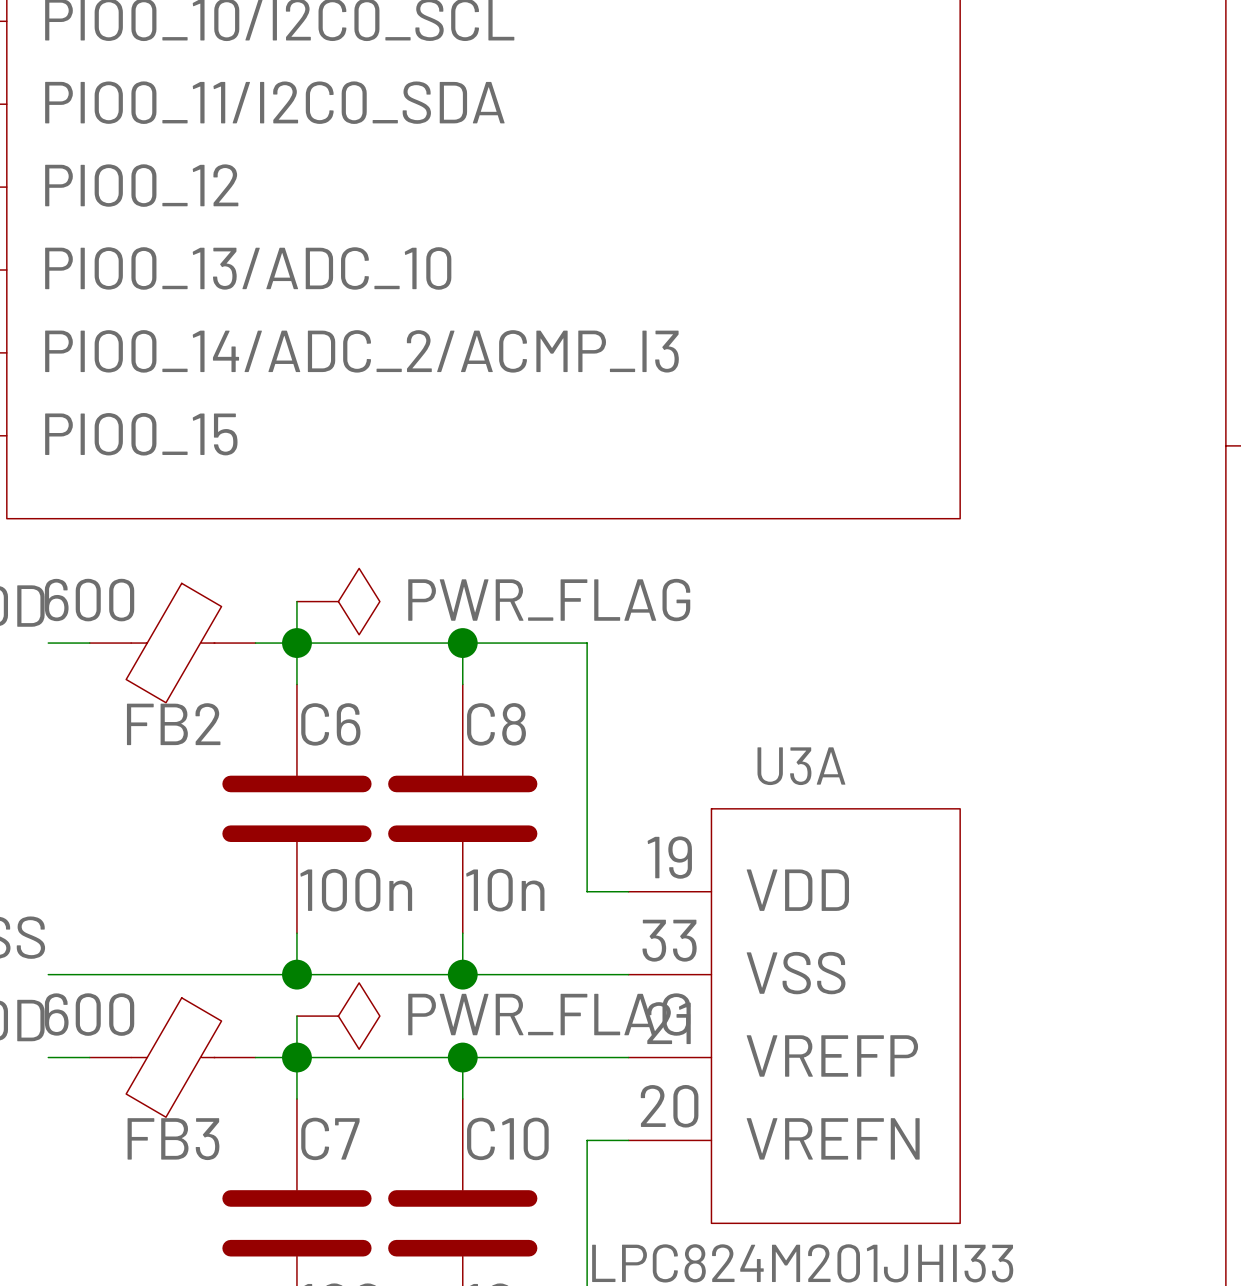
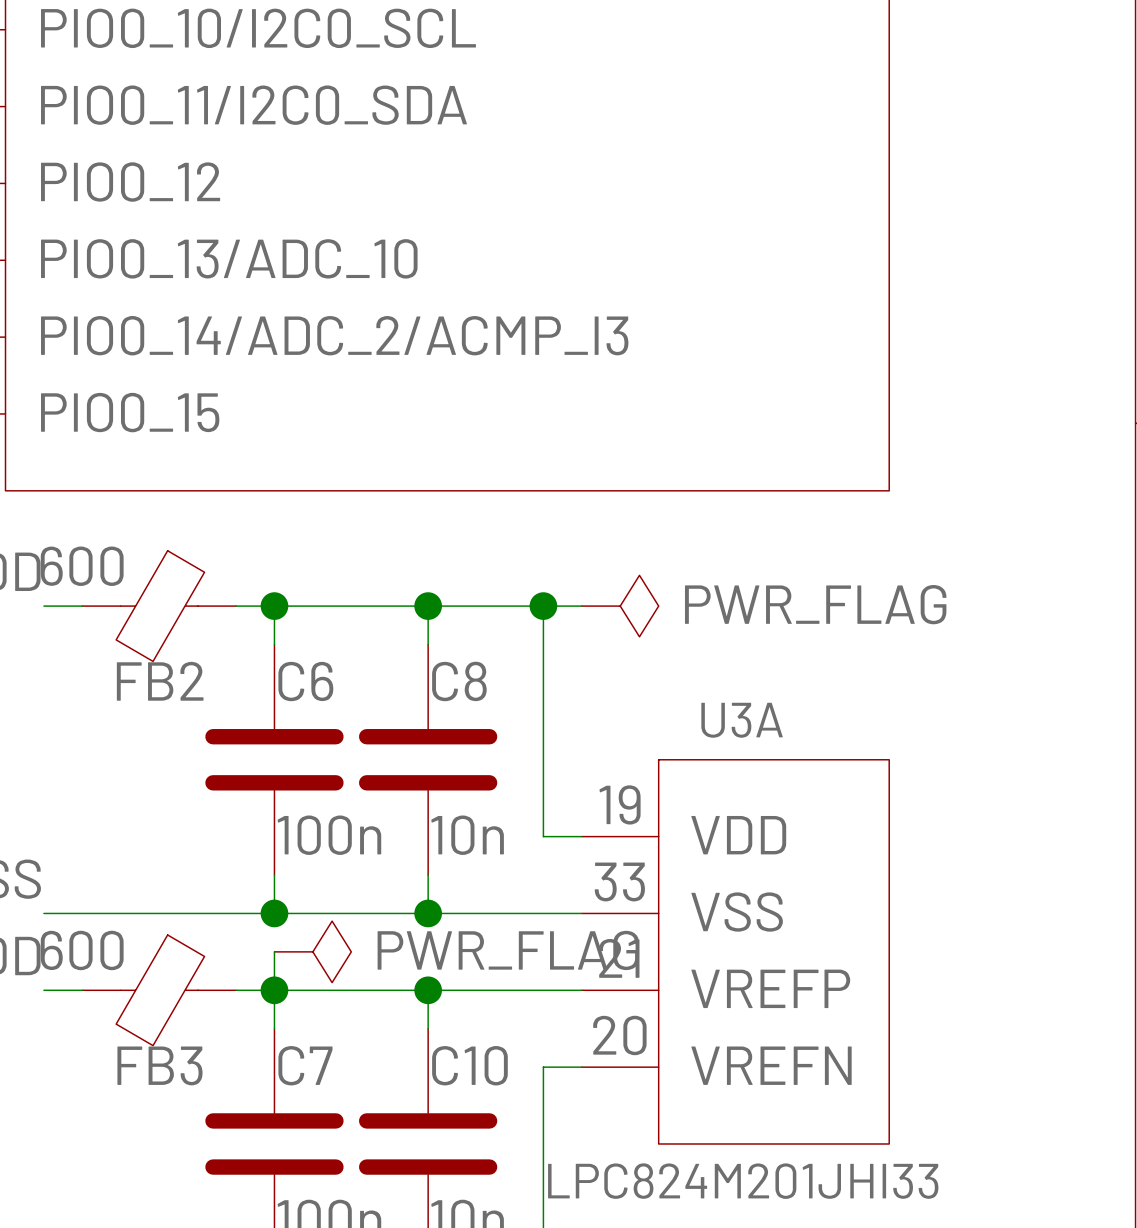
wire: (296, 601) (296, 643) -> none
power symbol position: PWR_FLAG (338, 601) -> PWR_FLAG (620, 606)
wire: none -> (543, 606) (581, 606)
junction: none -> (543, 606)

